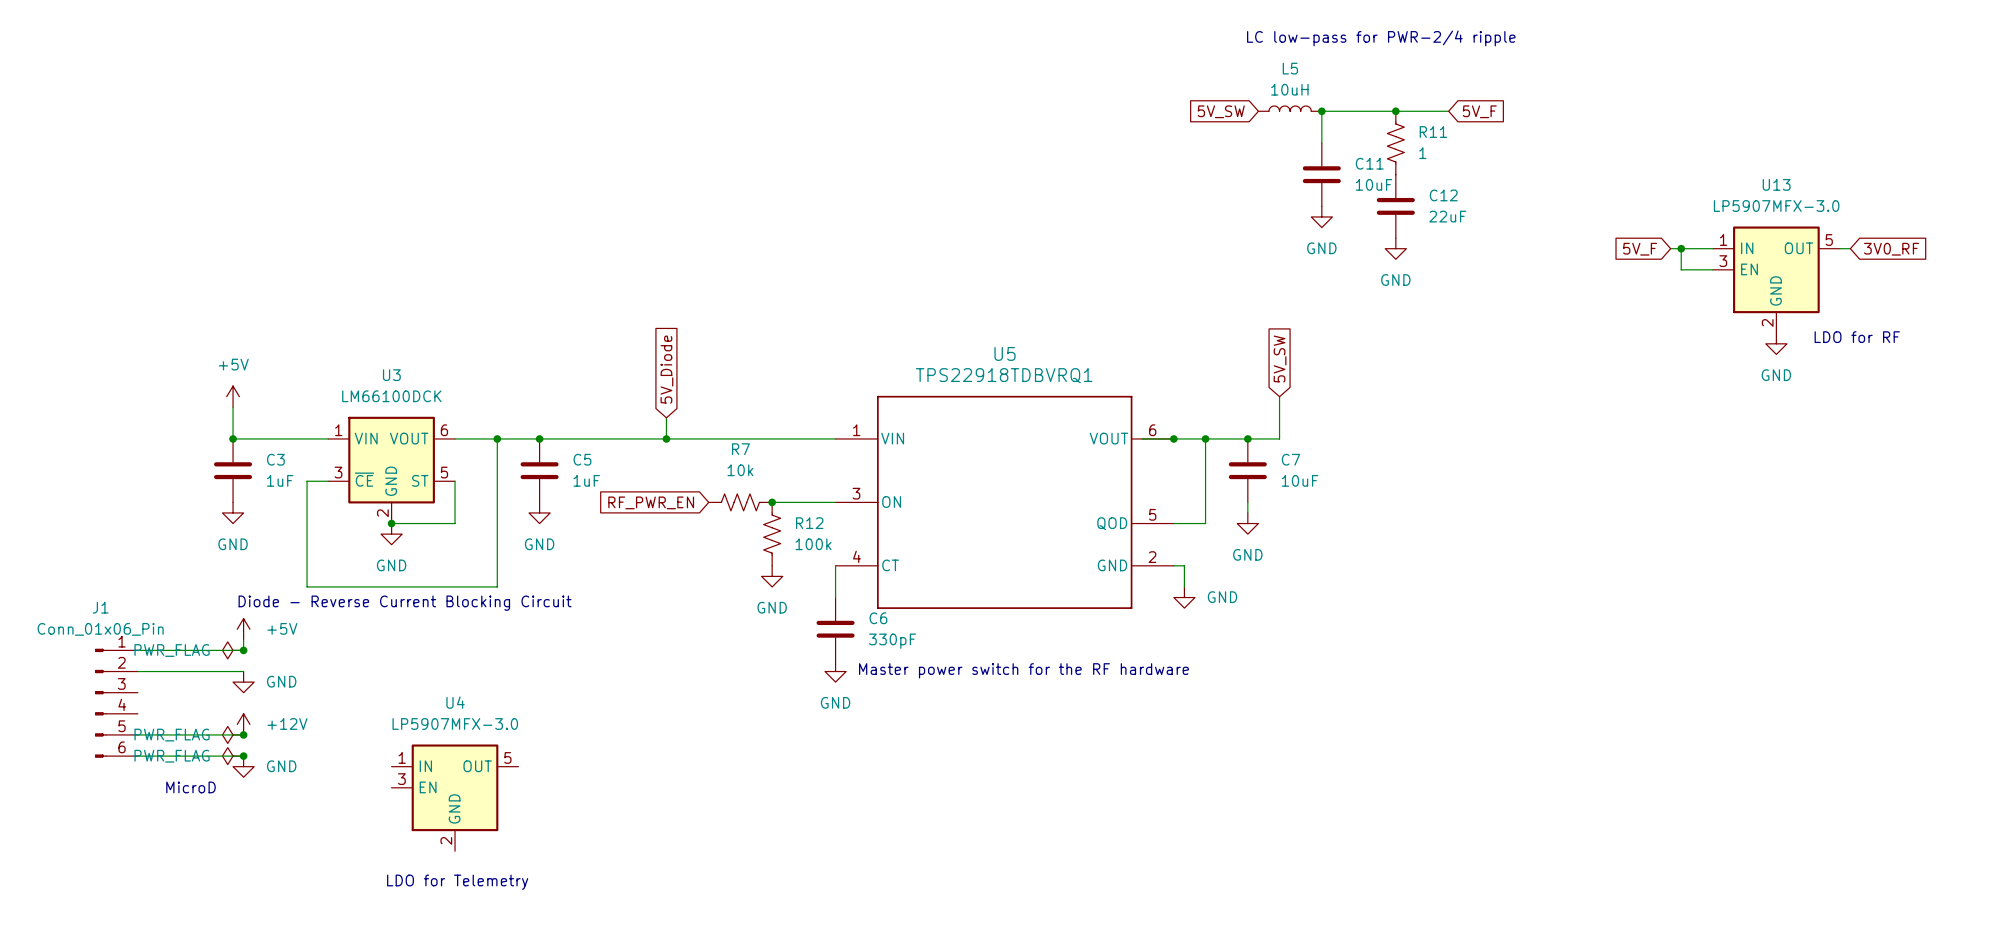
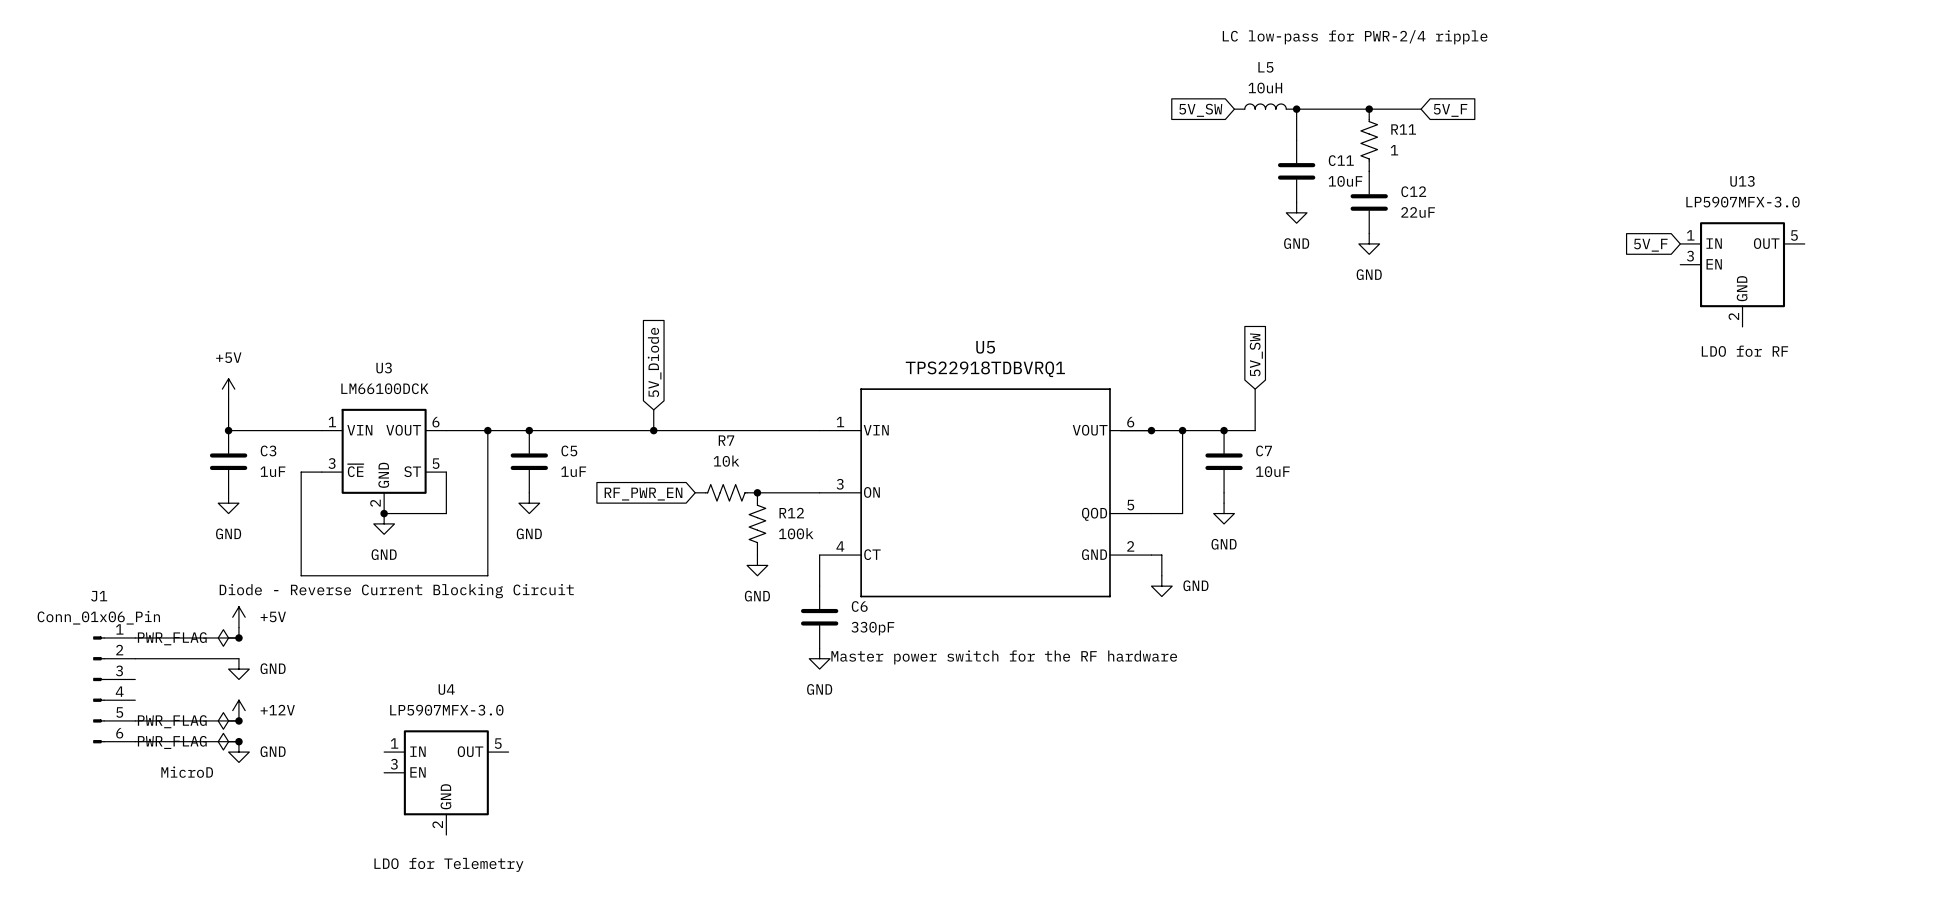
wire: (1670, 248) (1712, 248) -> none
wire: (1681, 248) (1681, 269) (1712, 269) -> none
junction: (1681, 248) -> none
wire: (1839, 248) (1850, 248) -> none
global label position: 5V_F (1640, 249) -> 5V_F (1650, 245)
global label: 3V0_RF (1891, 249) -> none
text position: LDO for RF (1857, 337) -> LDO for RF (1744, 351)
power symbol: GND (1776, 343) -> none

